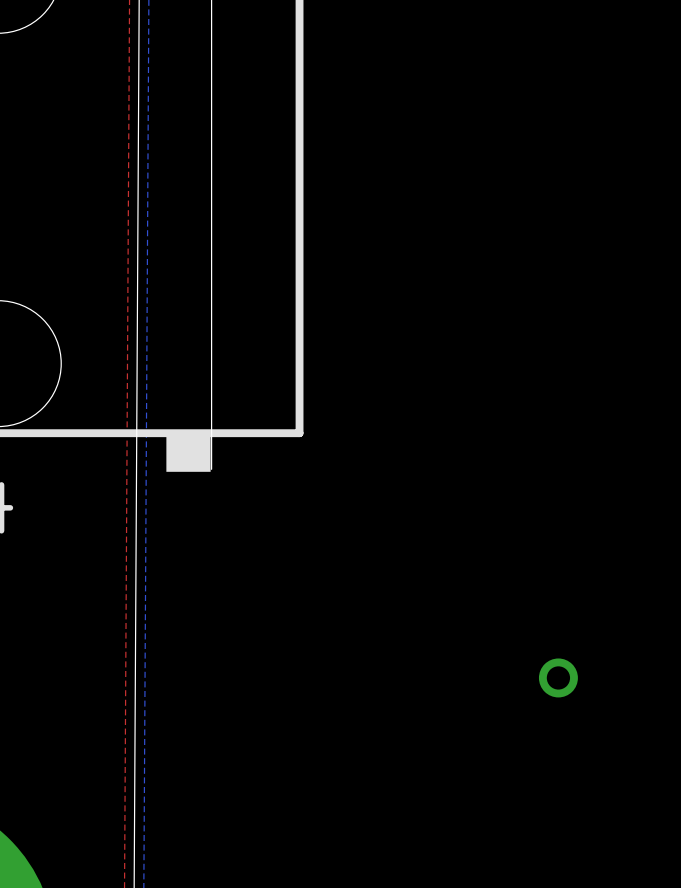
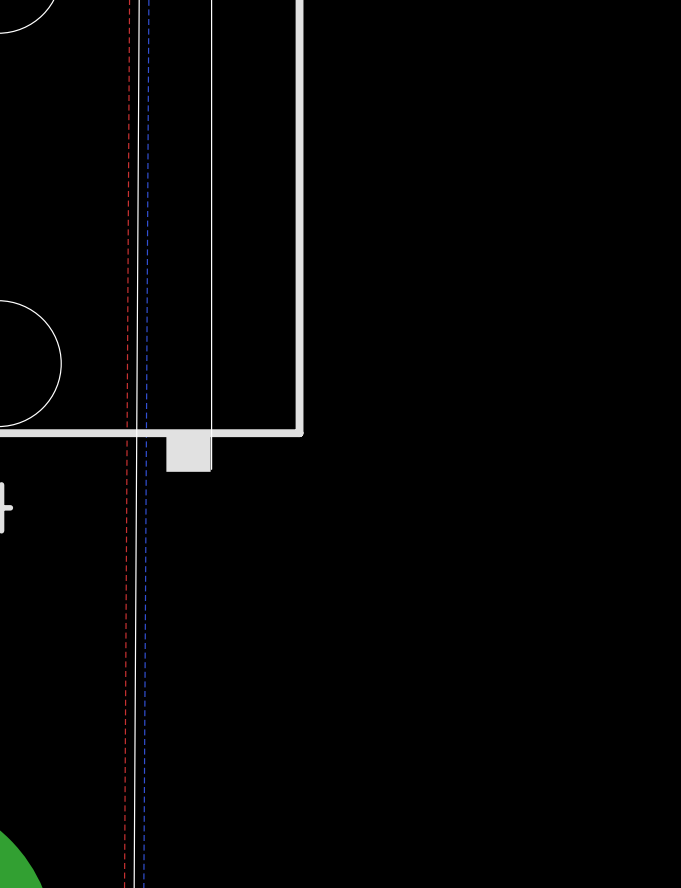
via: (558, 677) -> none

